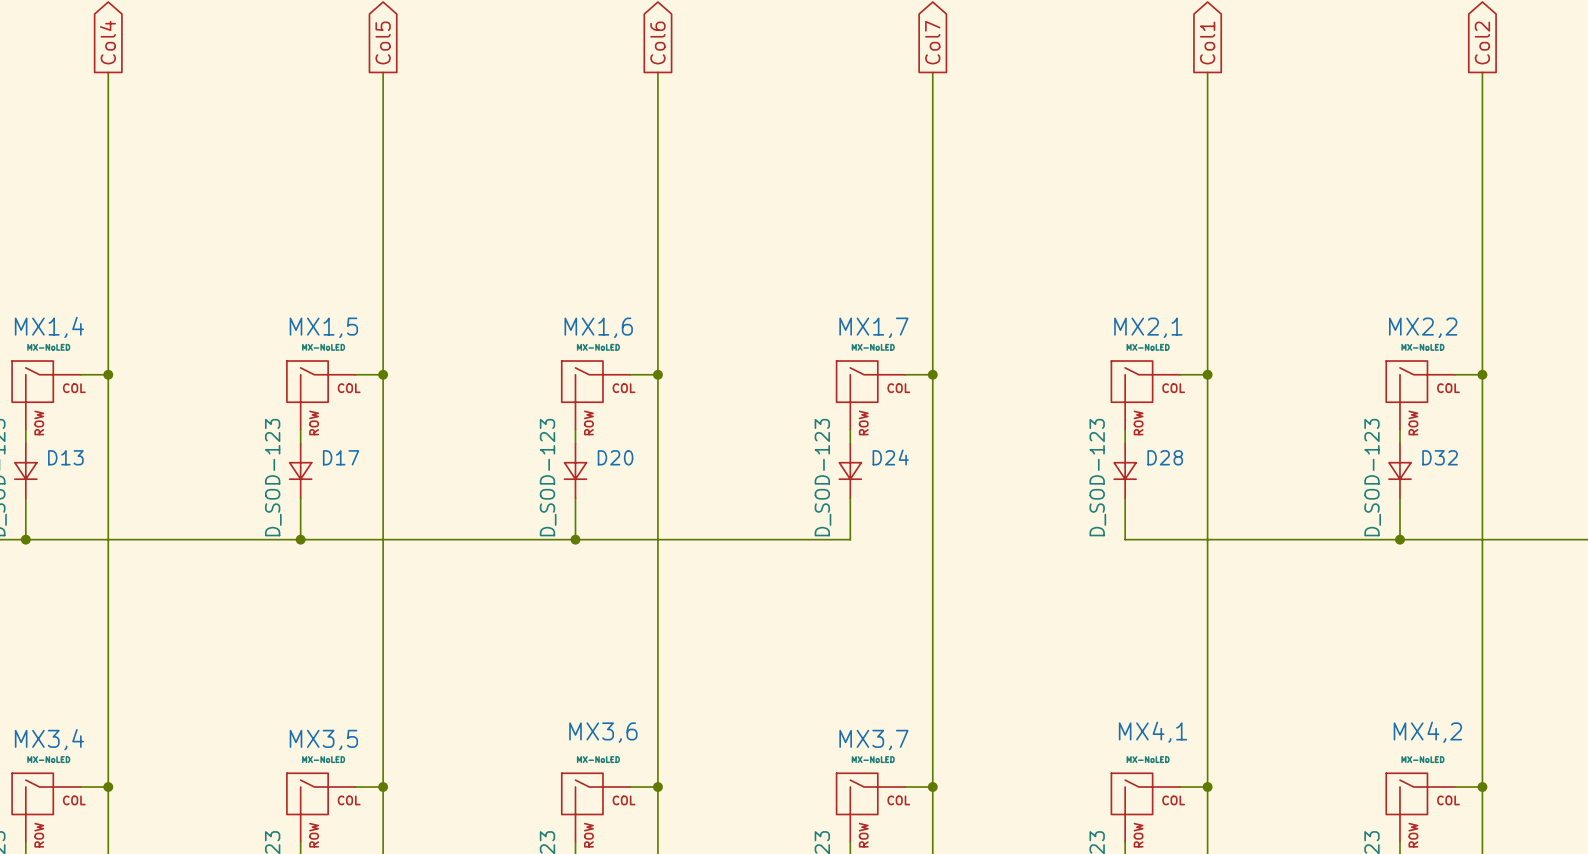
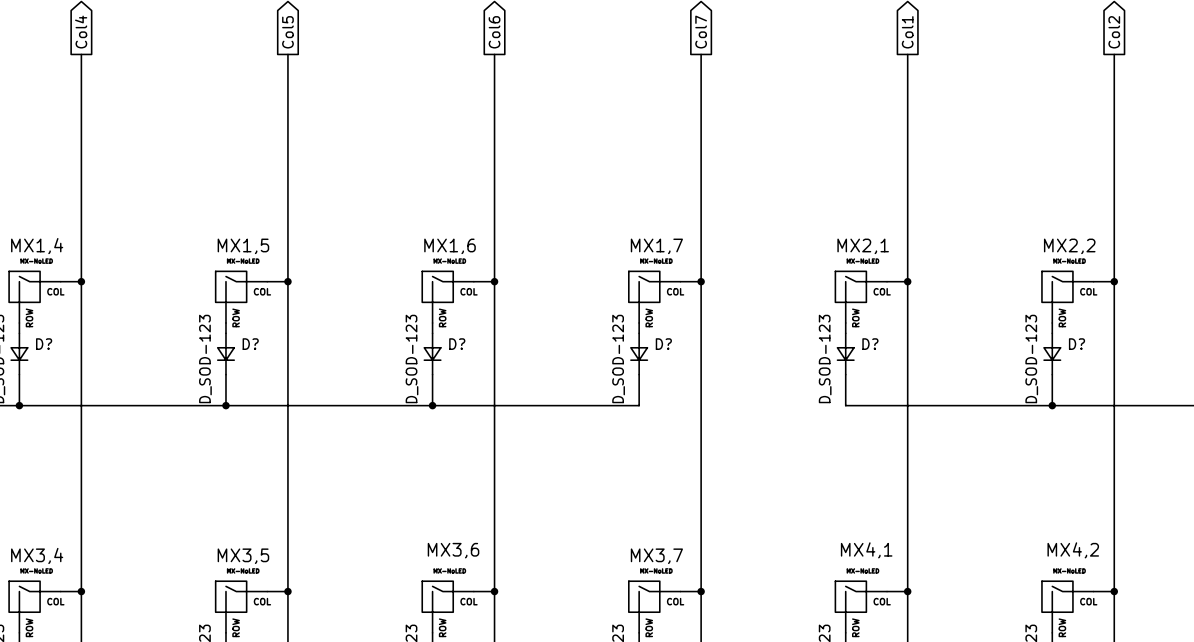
D13 name: D13 (65, 457) -> D? (44, 344)
D17 name: D17 (341, 457) -> D? (250, 344)
D20 name: D20 (615, 457) -> D? (457, 344)
D24 name: D24 (890, 457) -> D? (663, 344)
D28 name: D28 (1165, 457) -> D? (870, 344)
D32 name: D32 (1440, 457) -> D? (1076, 344)

